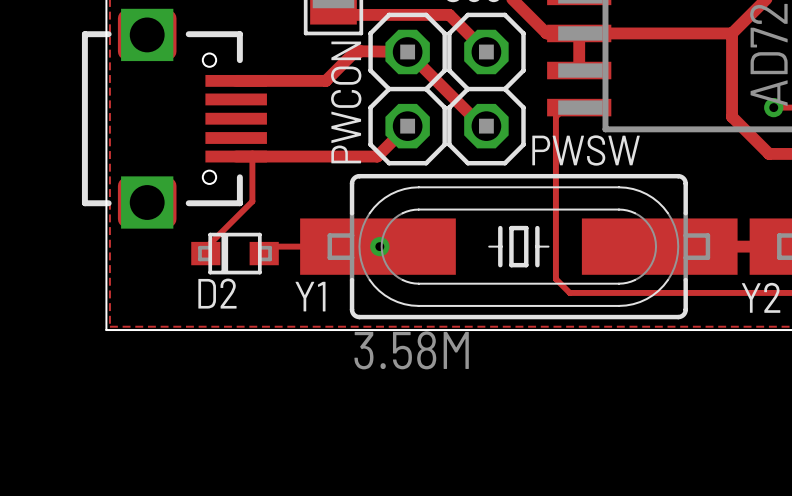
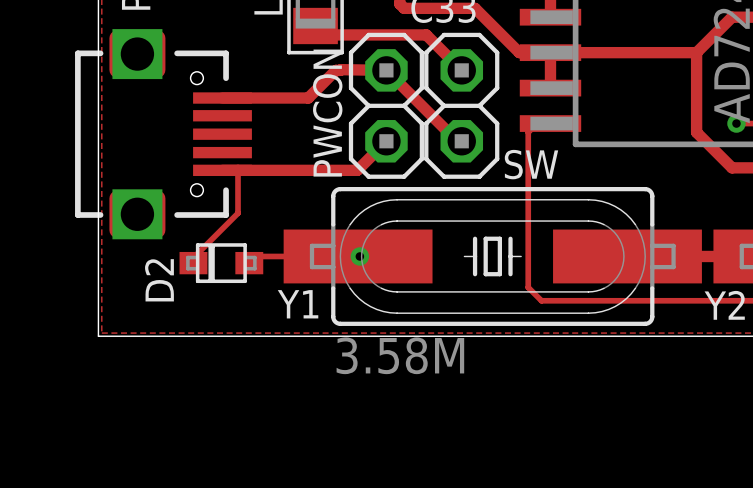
PWSW name: PWSW (586, 150) -> SW (531, 164)
D2 name rotation: 0° (217, 293) -> 90° counterclockwise (159, 280)

